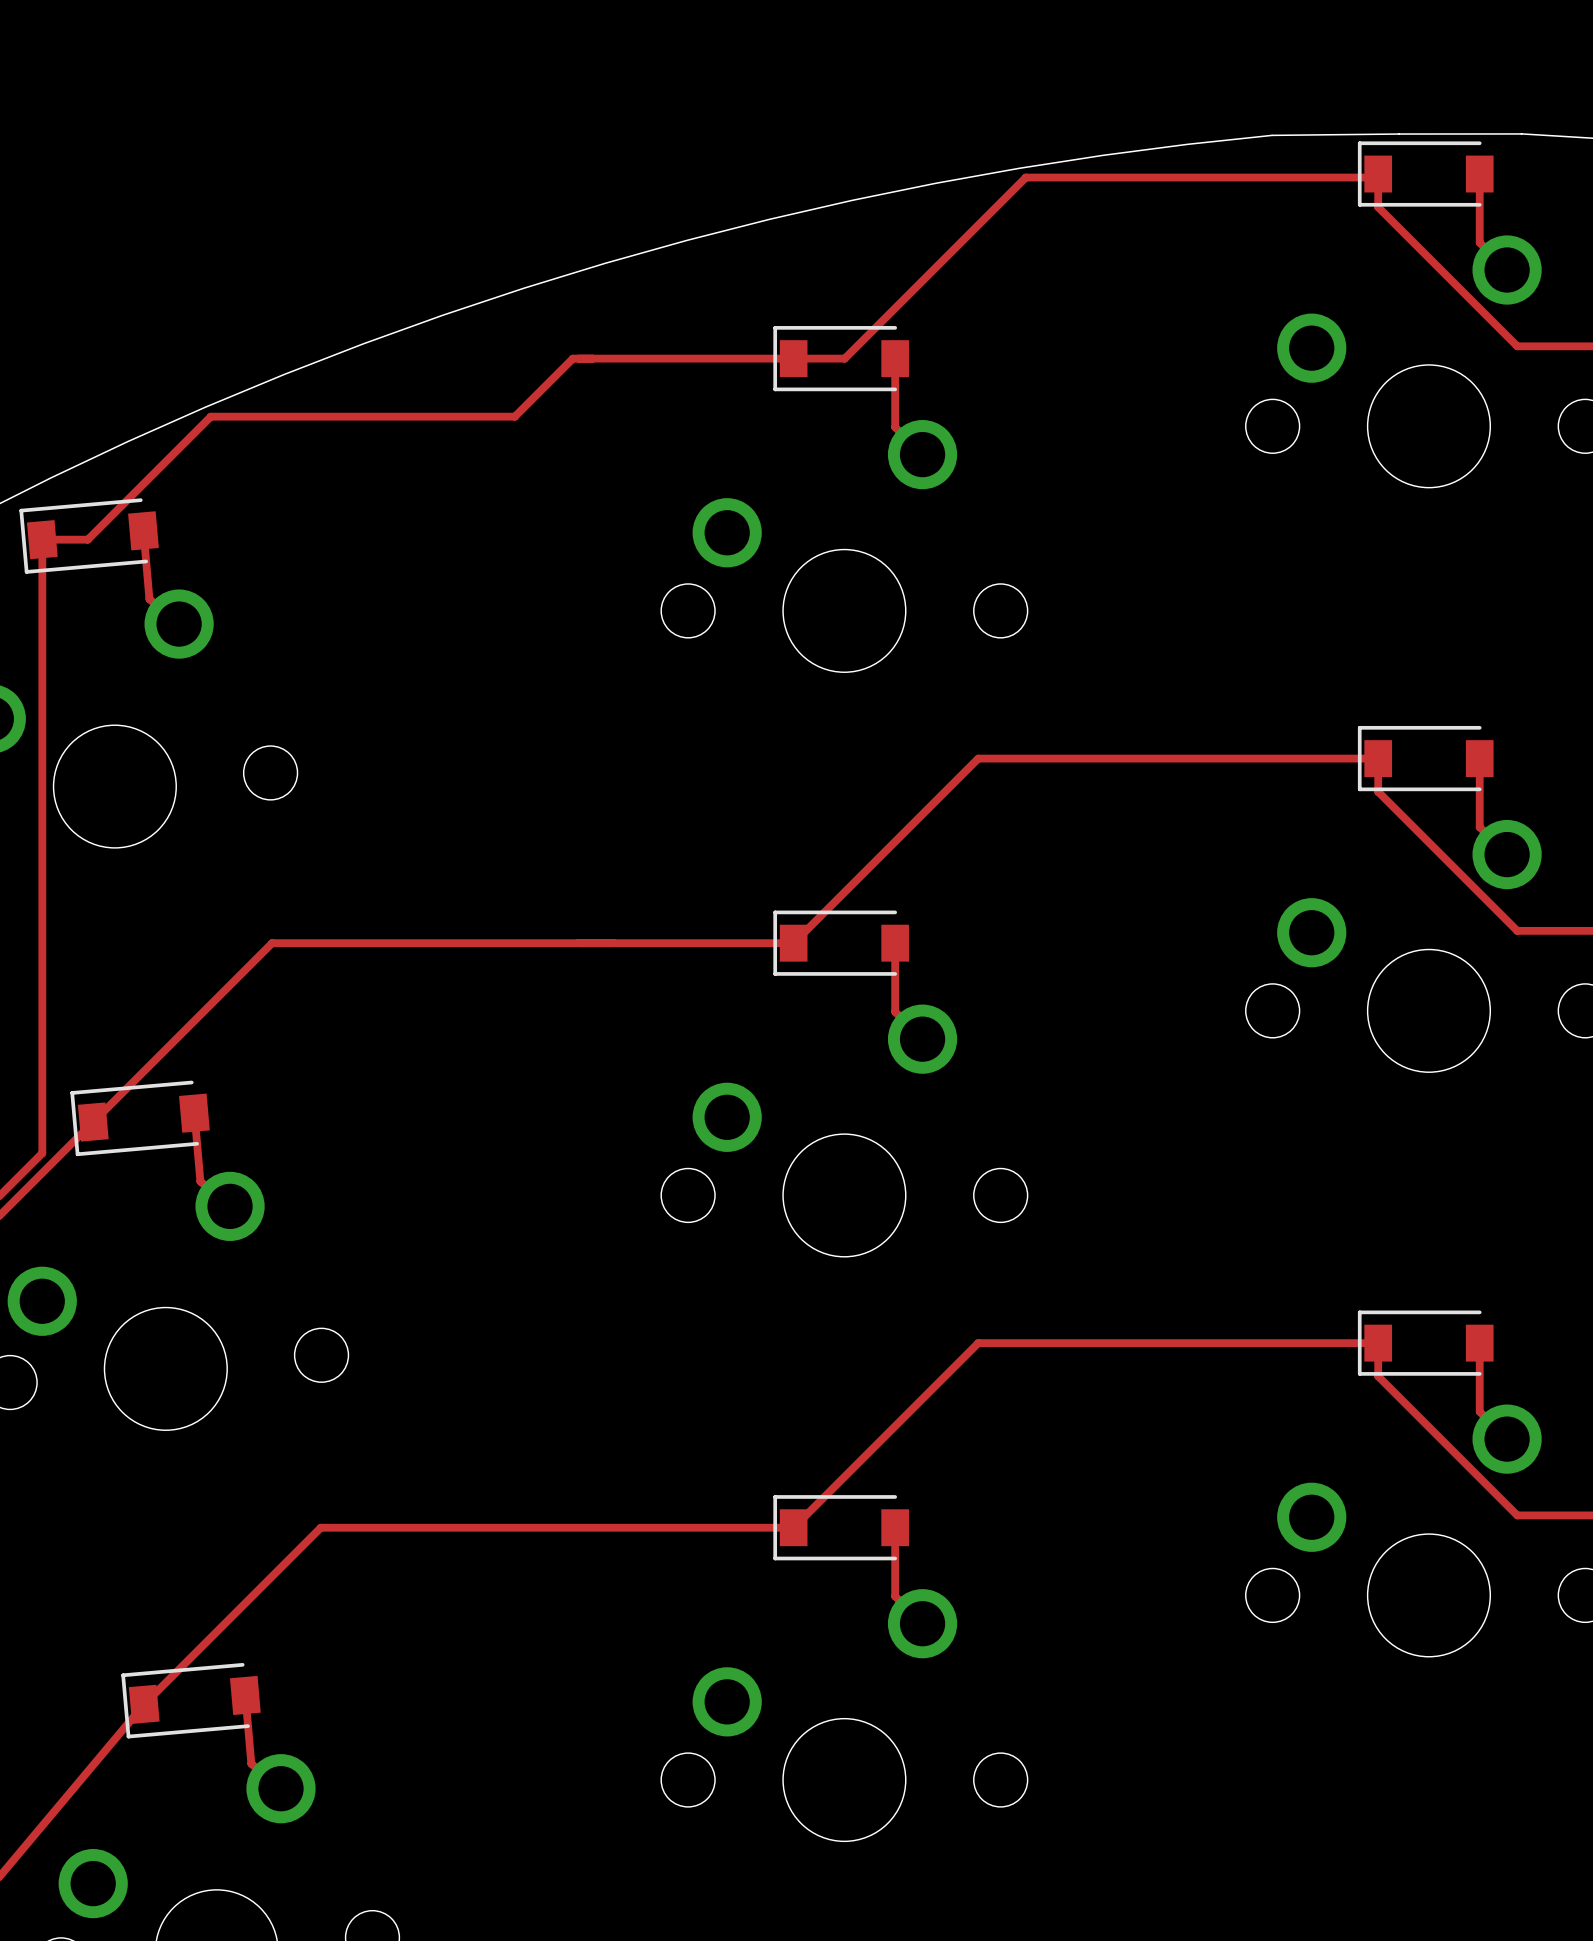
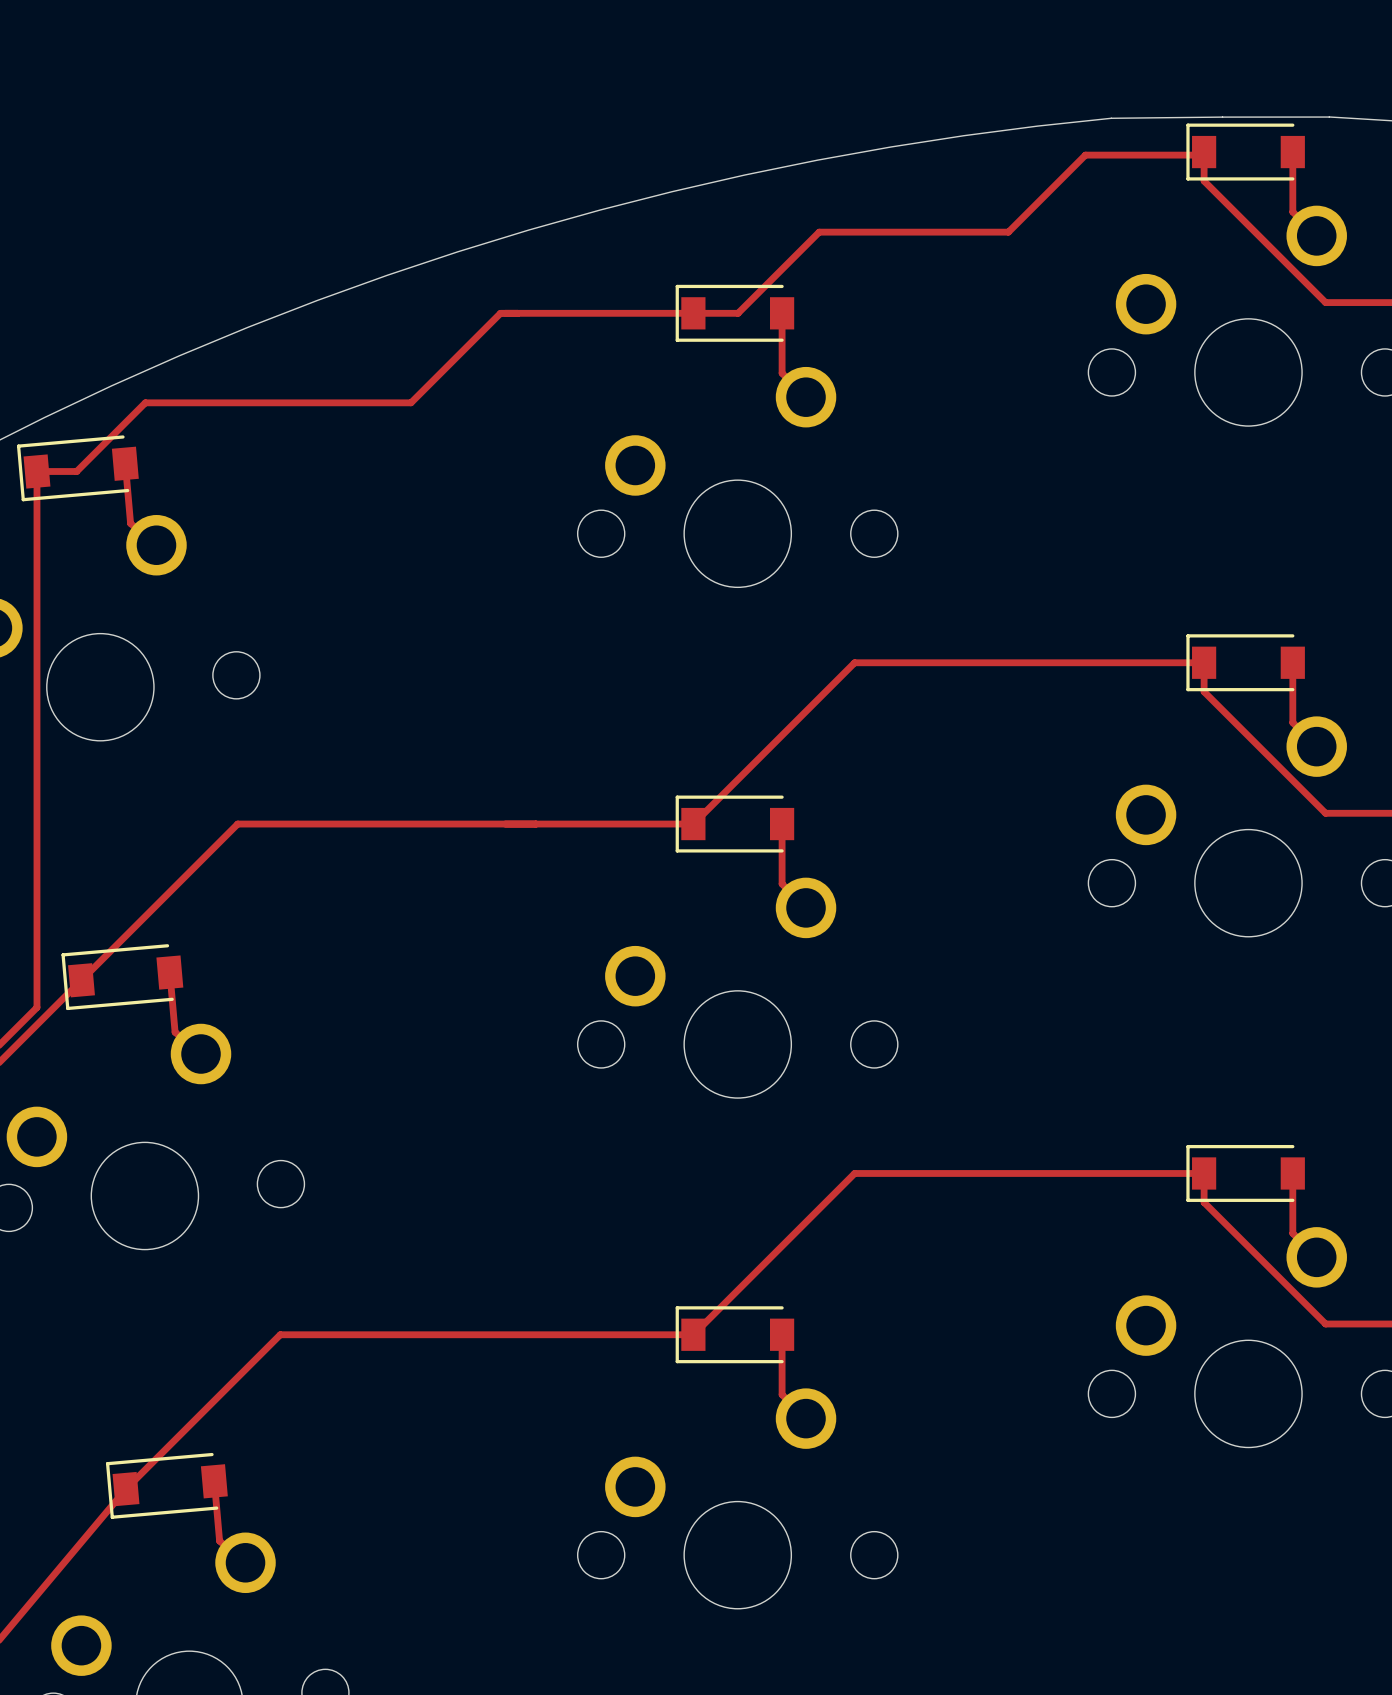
track: (1242, 177) (1025, 177) (937, 265) -> (1085, 155) (1008, 232) (819, 232)
track: (514, 416) (210, 416) (166, 461) -> (449, 364) (411, 402) (145, 402)

